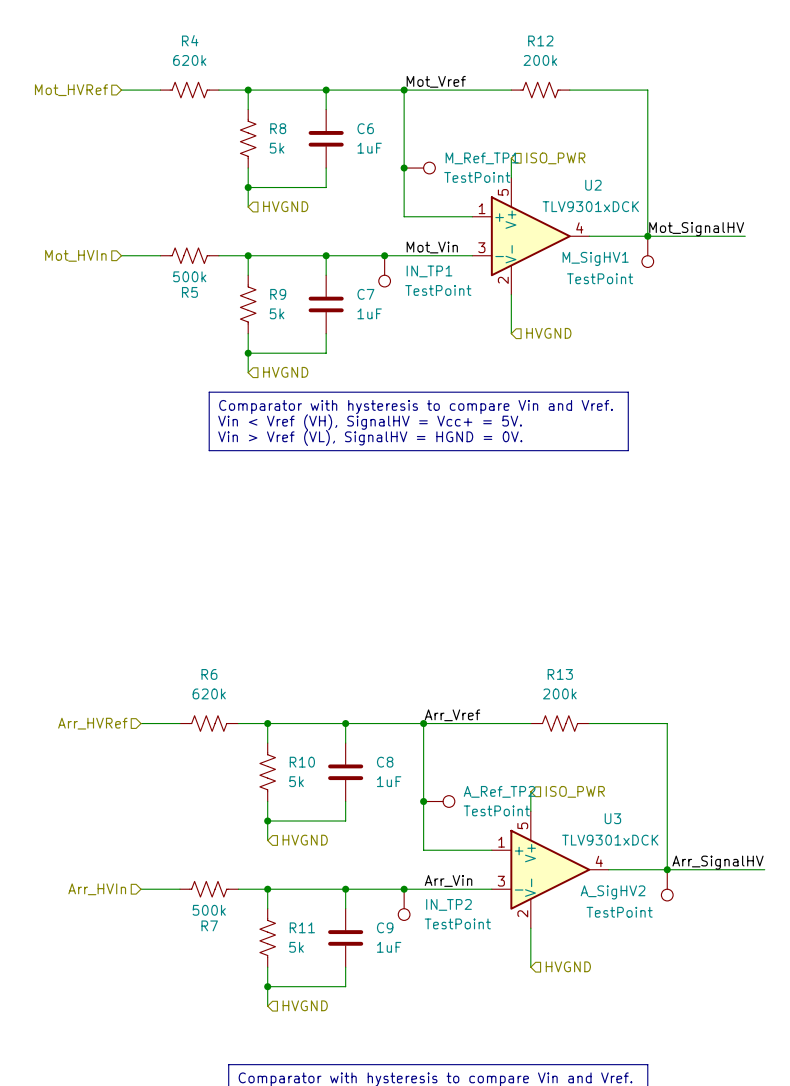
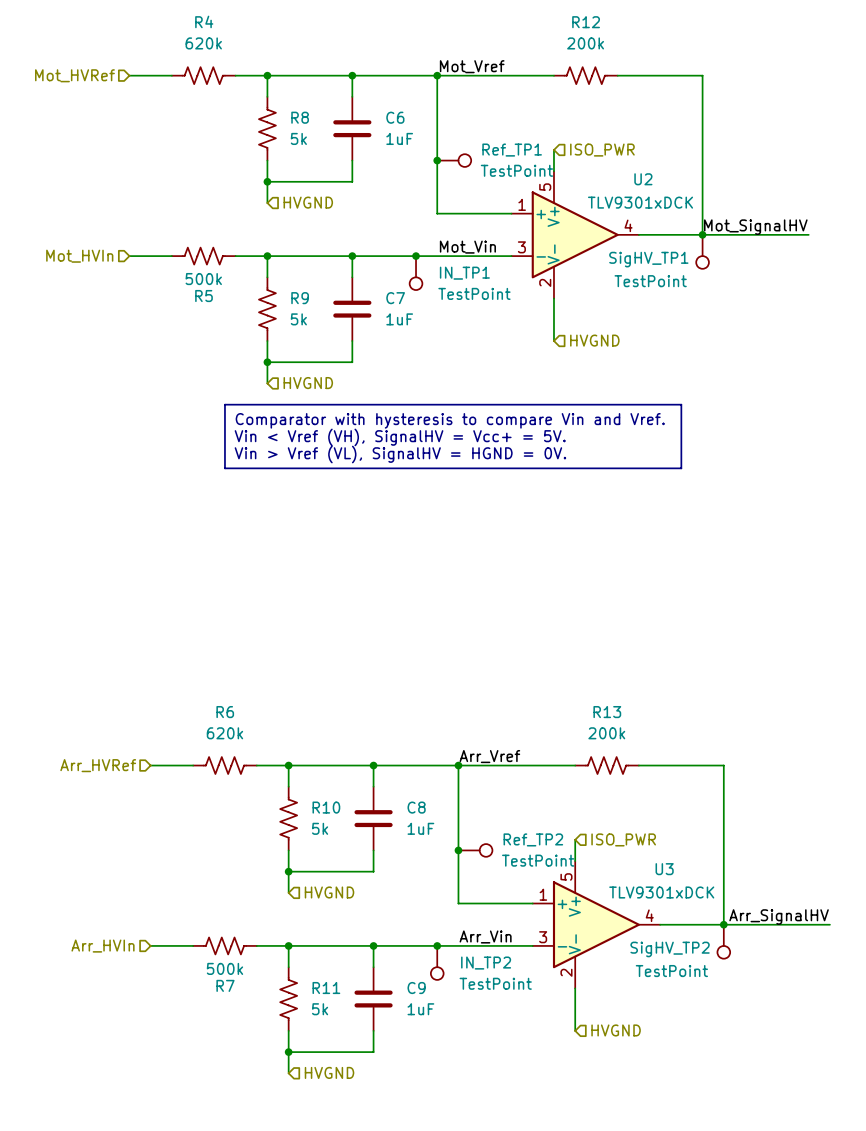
M_Ref_TP1 name: M_Ref_TP1 (482, 158) -> Ref_TP1 (512, 150)
M_SigHV1 name: M_SigHV1 (595, 258) -> SigHV_TP1 (648, 259)
A_Ref_TP2 name: A_Ref_TP2 (499, 791) -> Ref_TP2 (533, 839)
A_SigHV2 name: A_SigHV2 (613, 892) -> SigHV_TP2 (670, 949)

